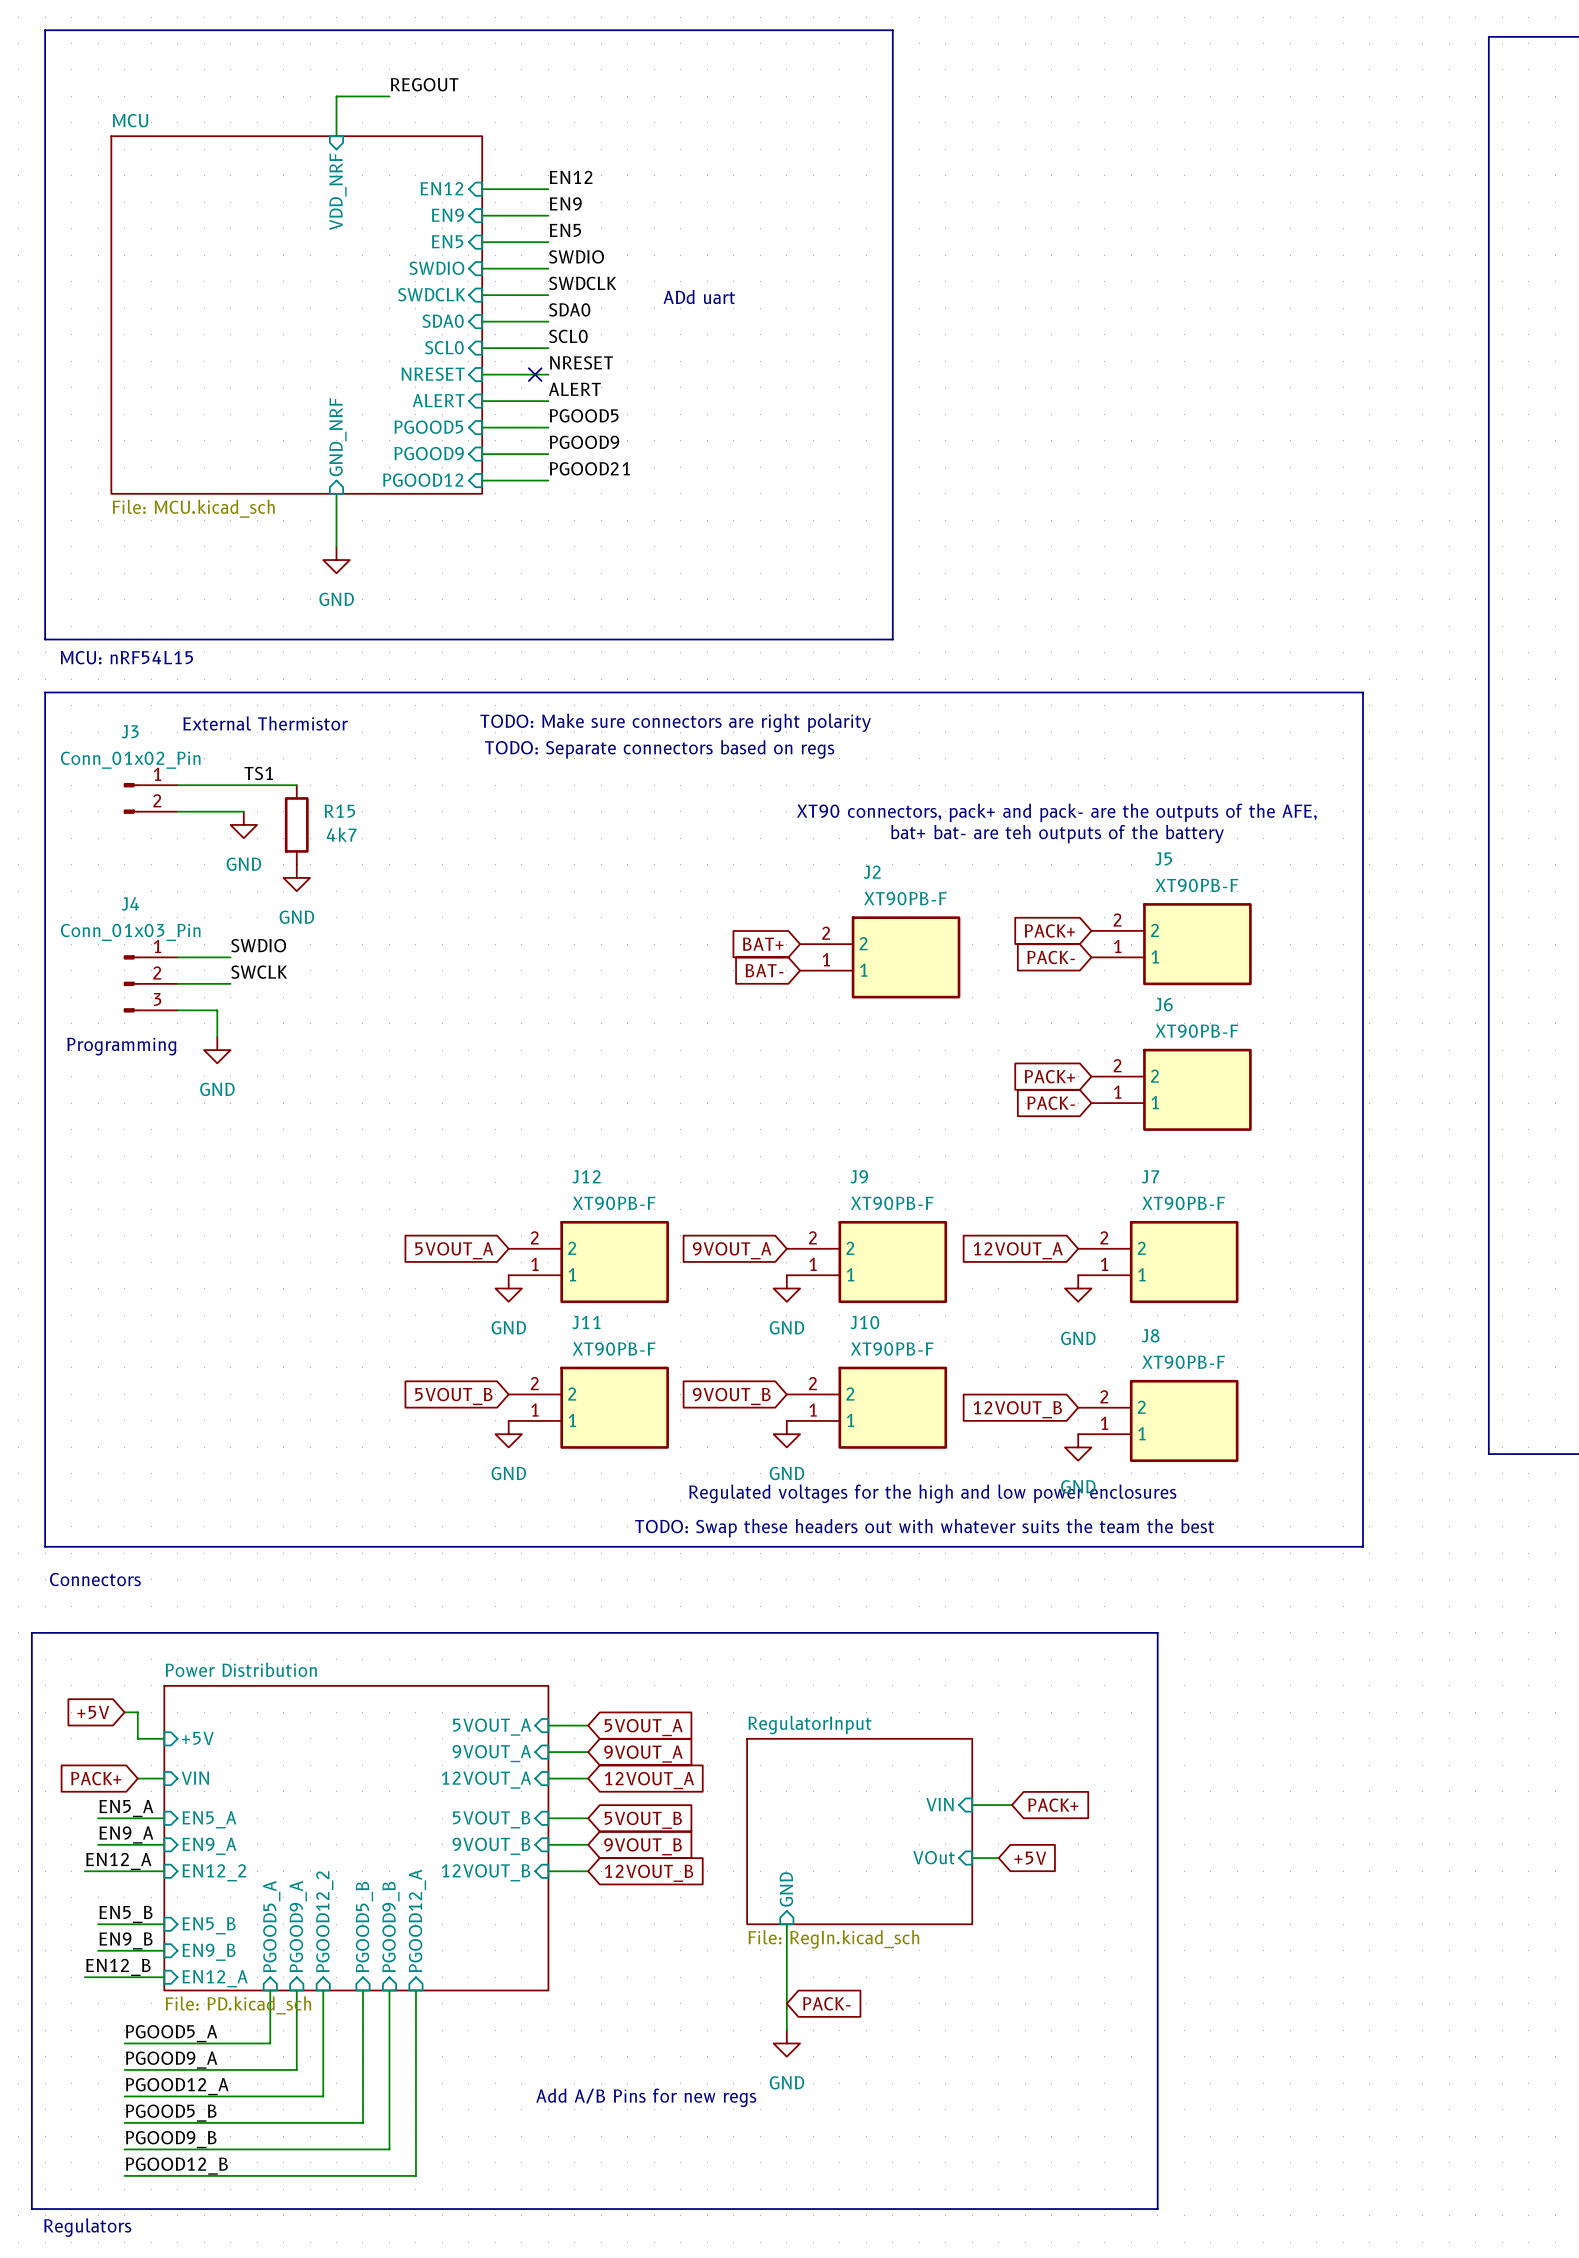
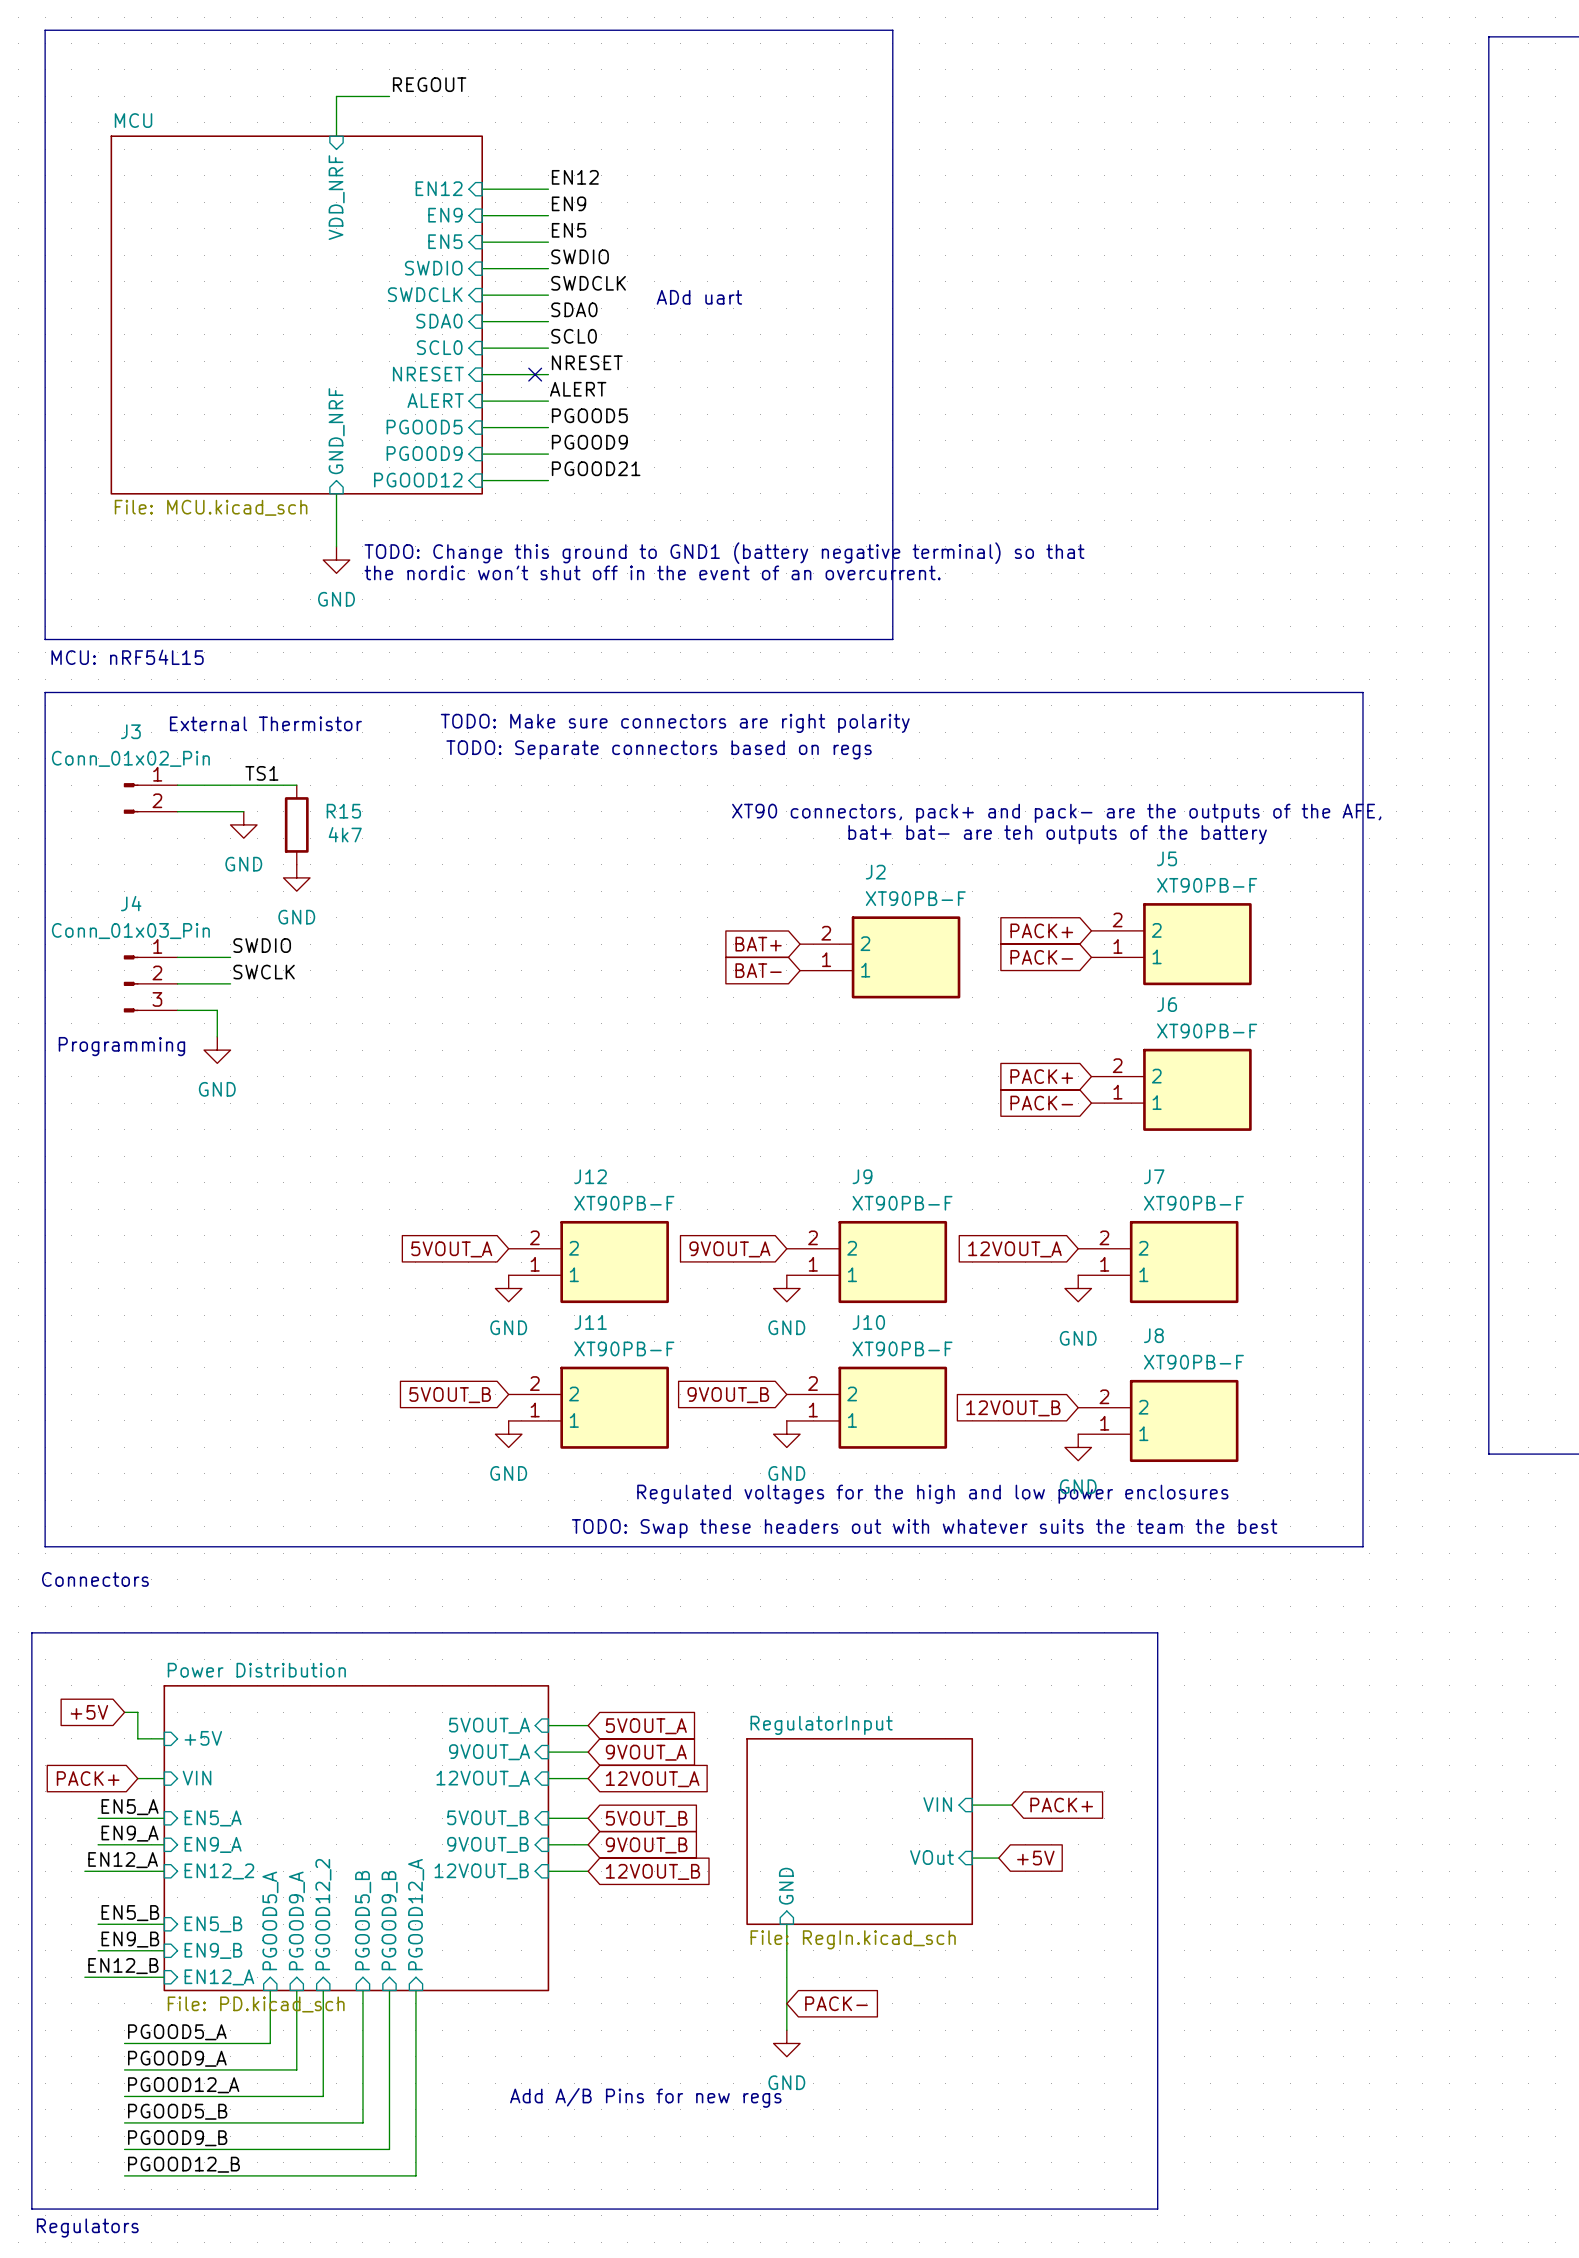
text: none -> TODO: Change this ground to GND1 (battery negative terminal) so that (724, 553)
text: none -> the nordic won't shut off in the event of an overcurrent. (652, 572)

